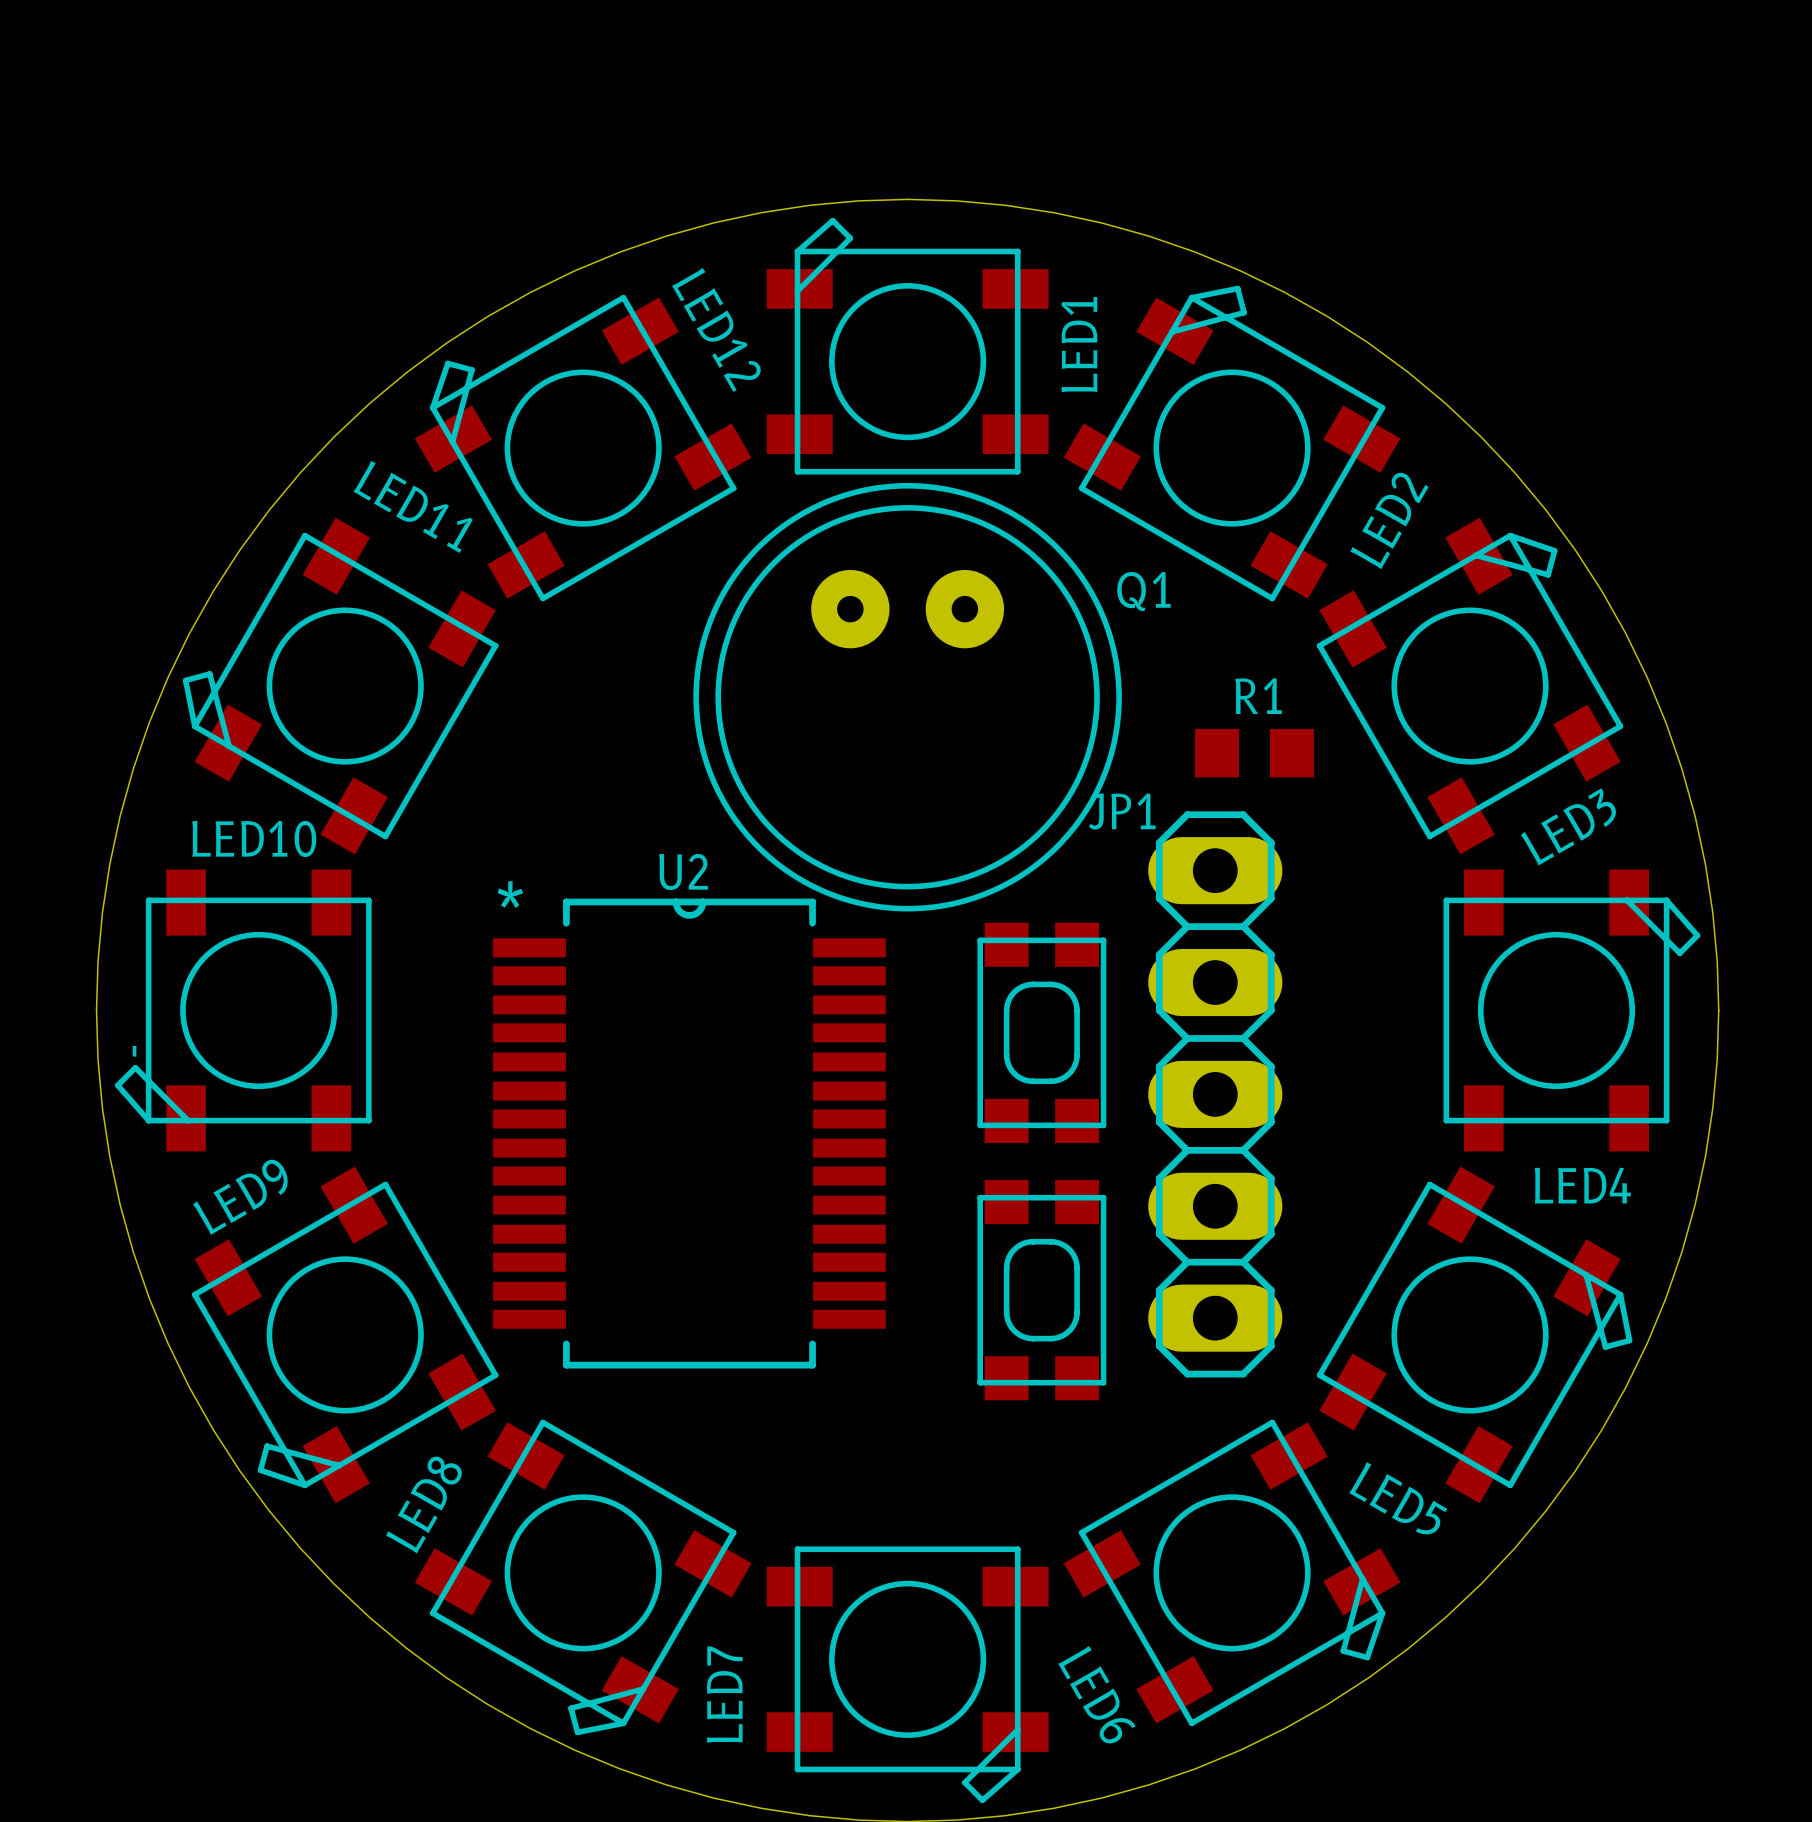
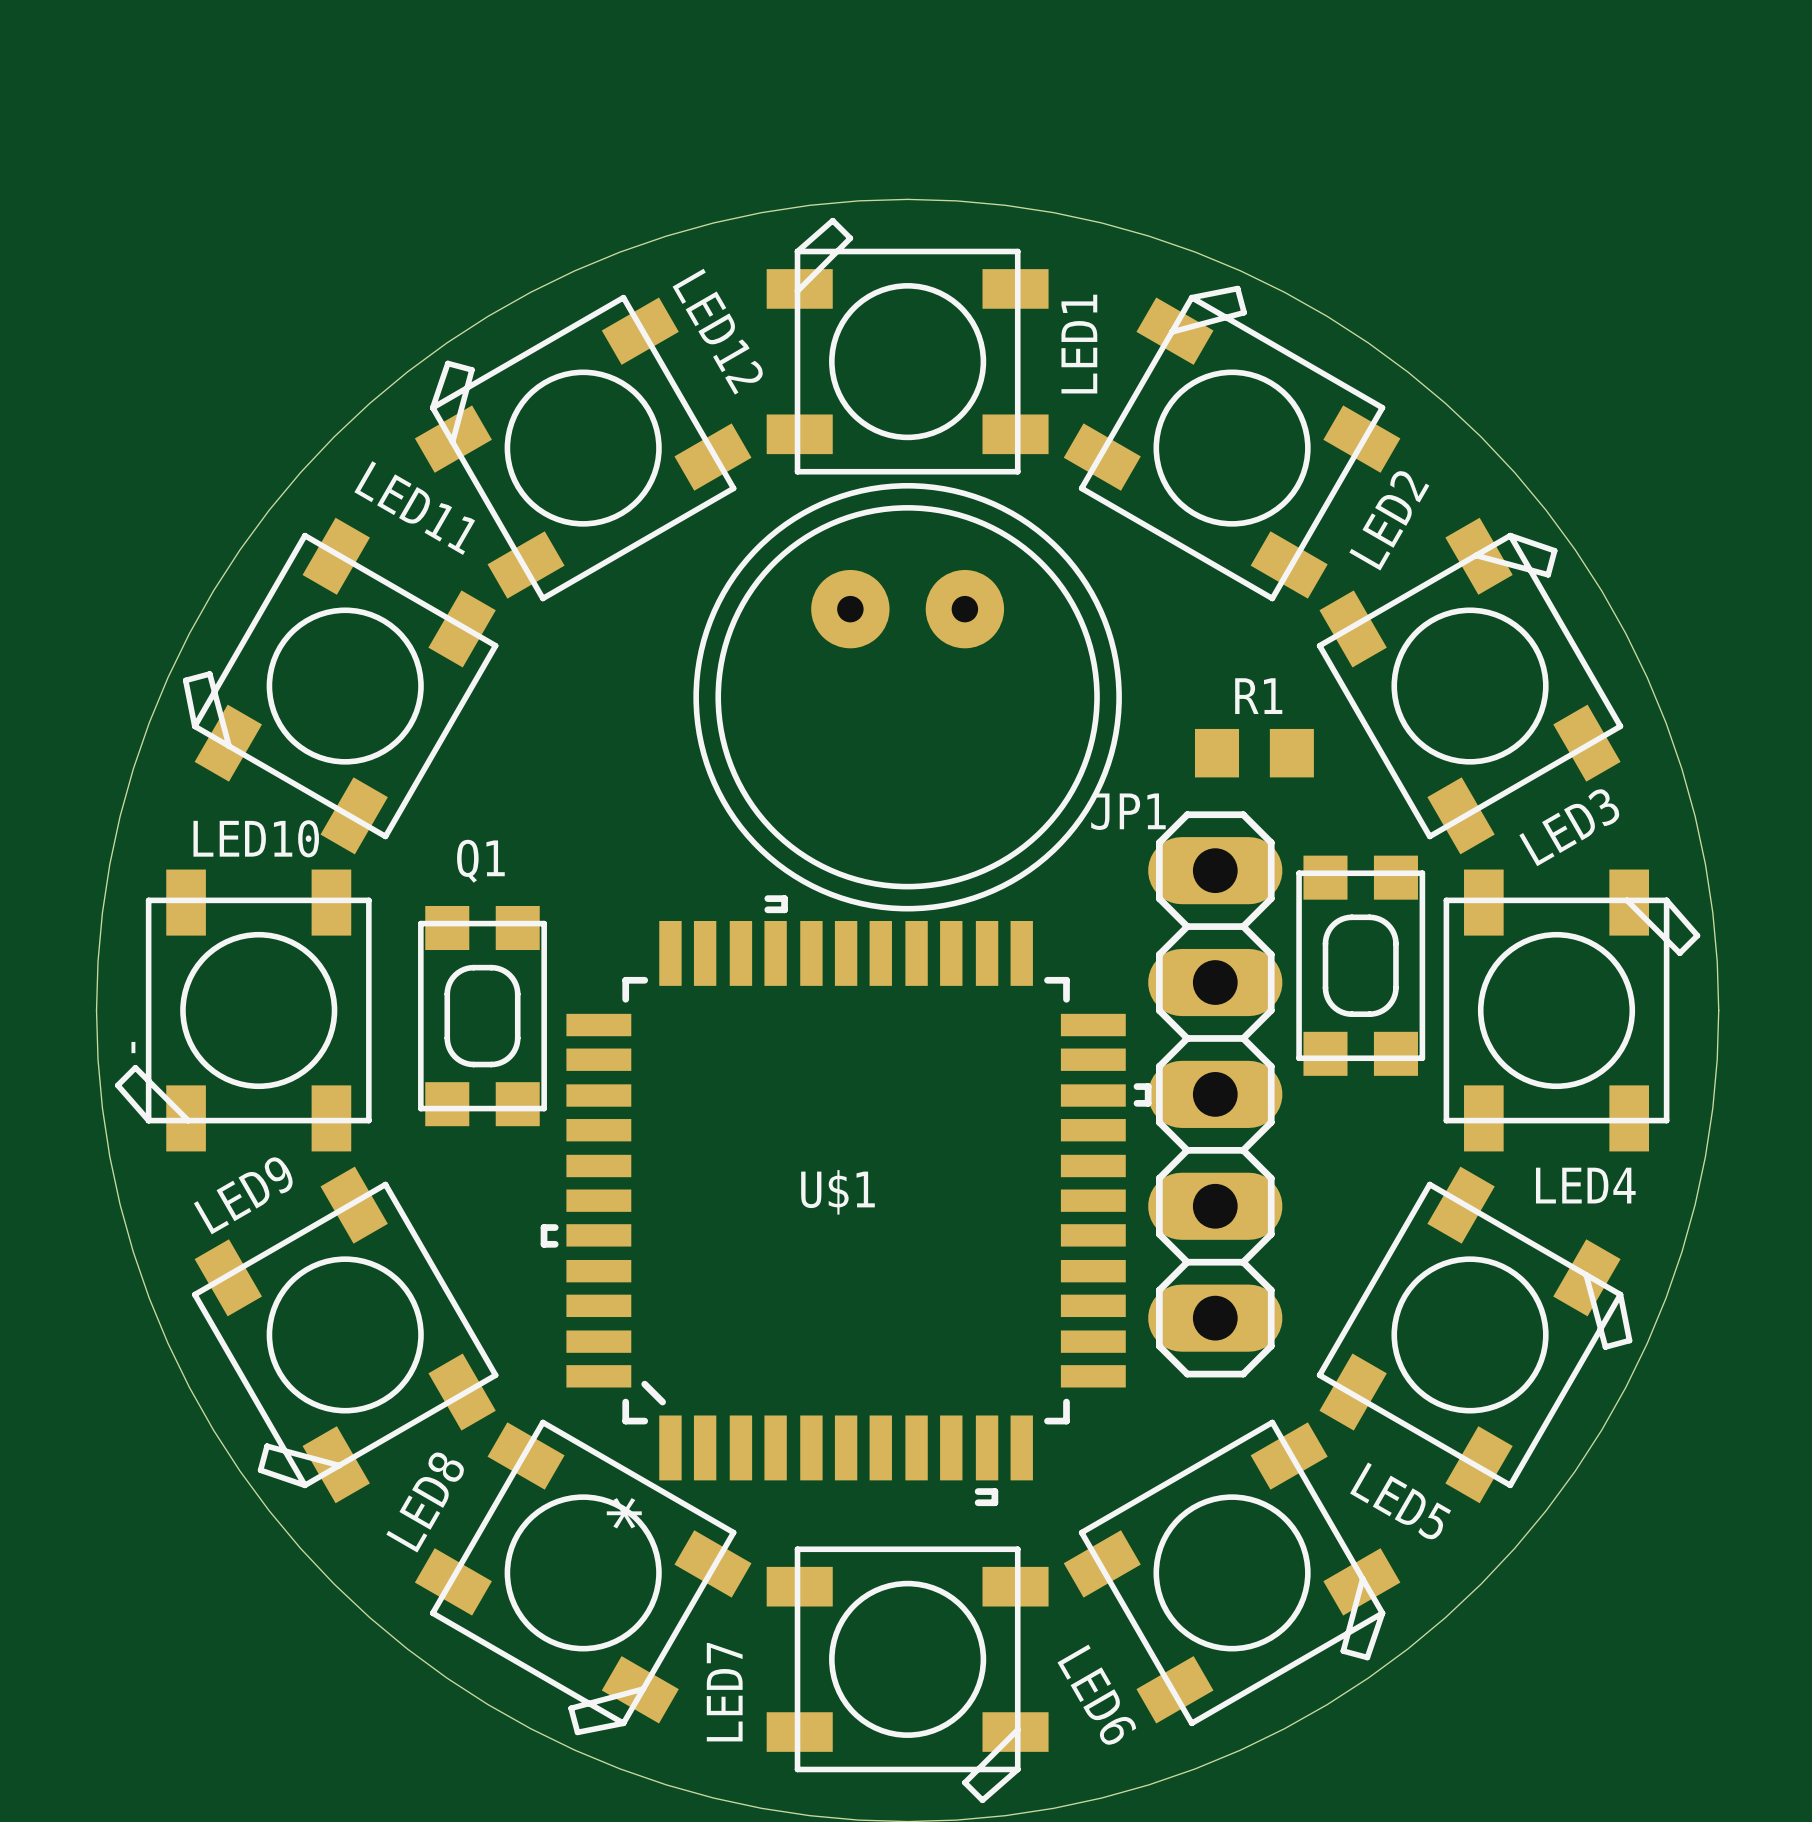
Q1 name position: Q1 (1144, 591) -> Q1 (480, 861)
part: none -> (1360, 965)
part: none -> (482, 1016)
part: (1041, 1032) -> none
U2: (689, 1133) -> none
U$1: none -> (846, 1200)
part: (1041, 1290) -> none

